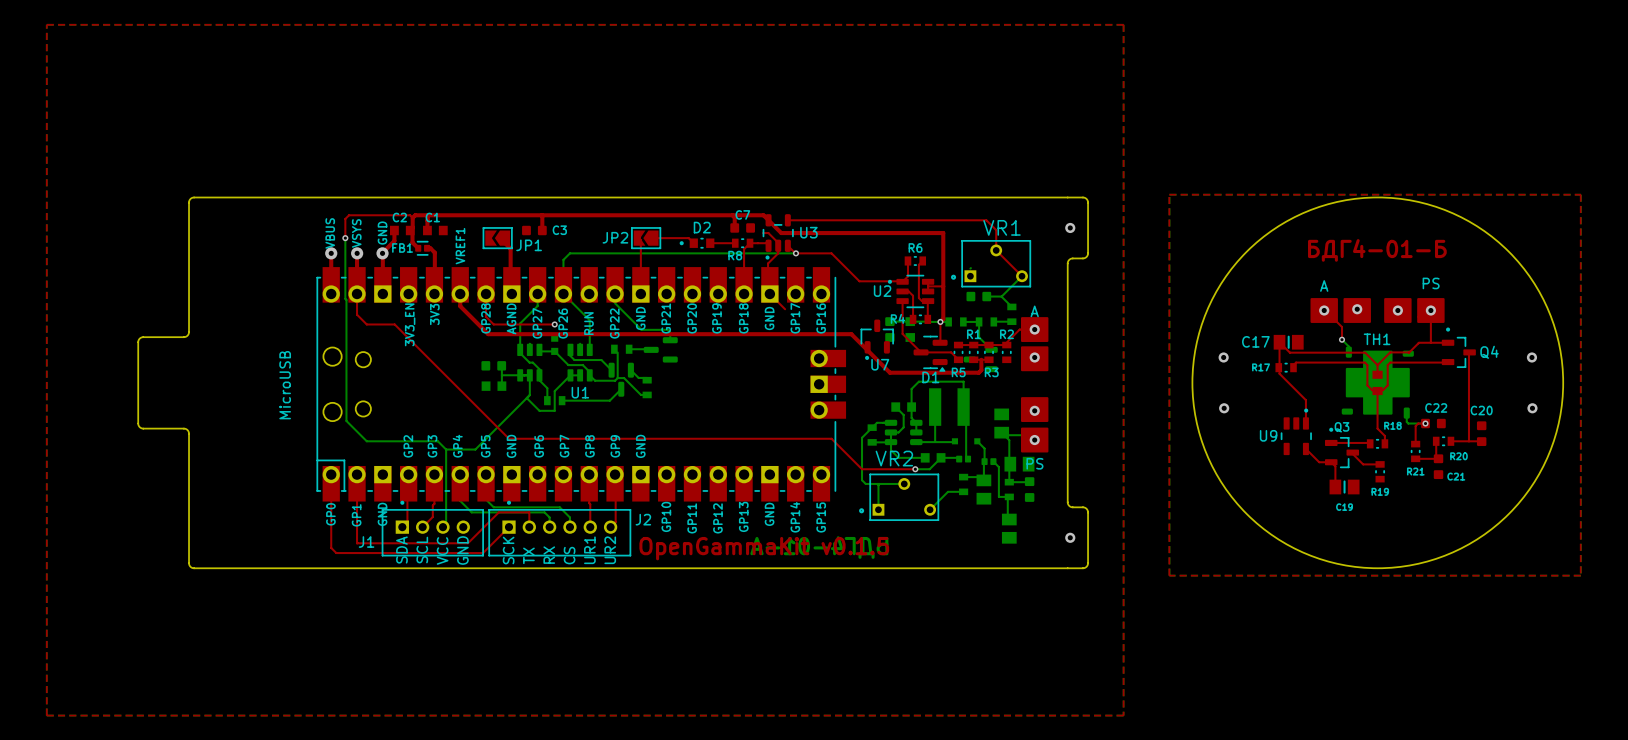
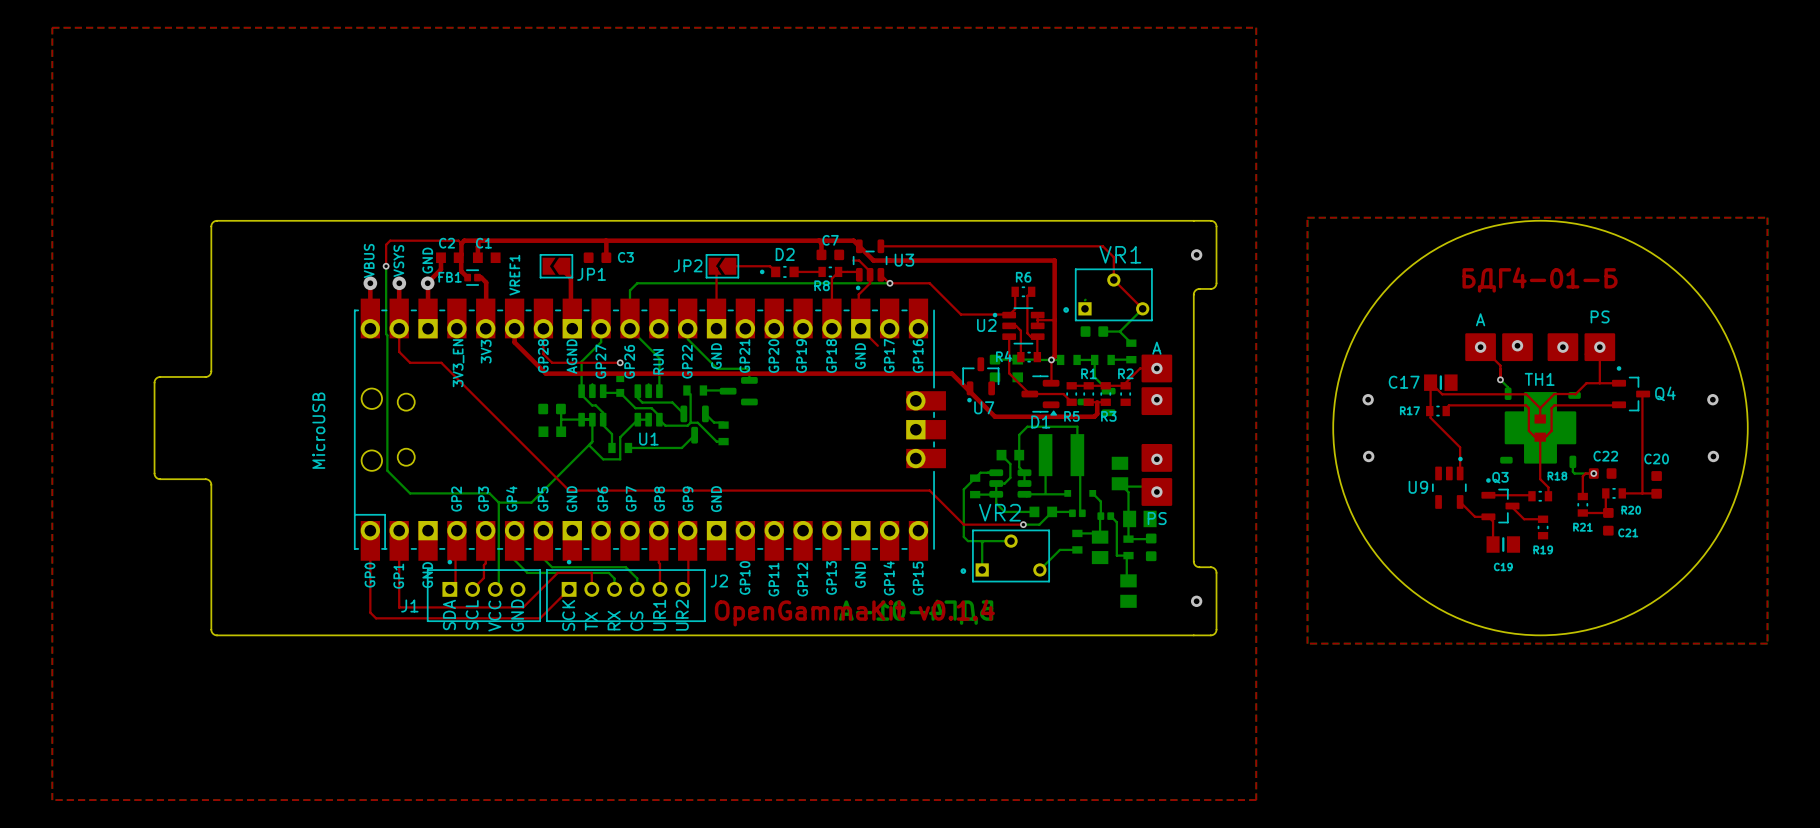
text: OpenGammaKit v0.1.5 (764, 548) -> OpenGammaKit v0.1.4 (854, 613)

